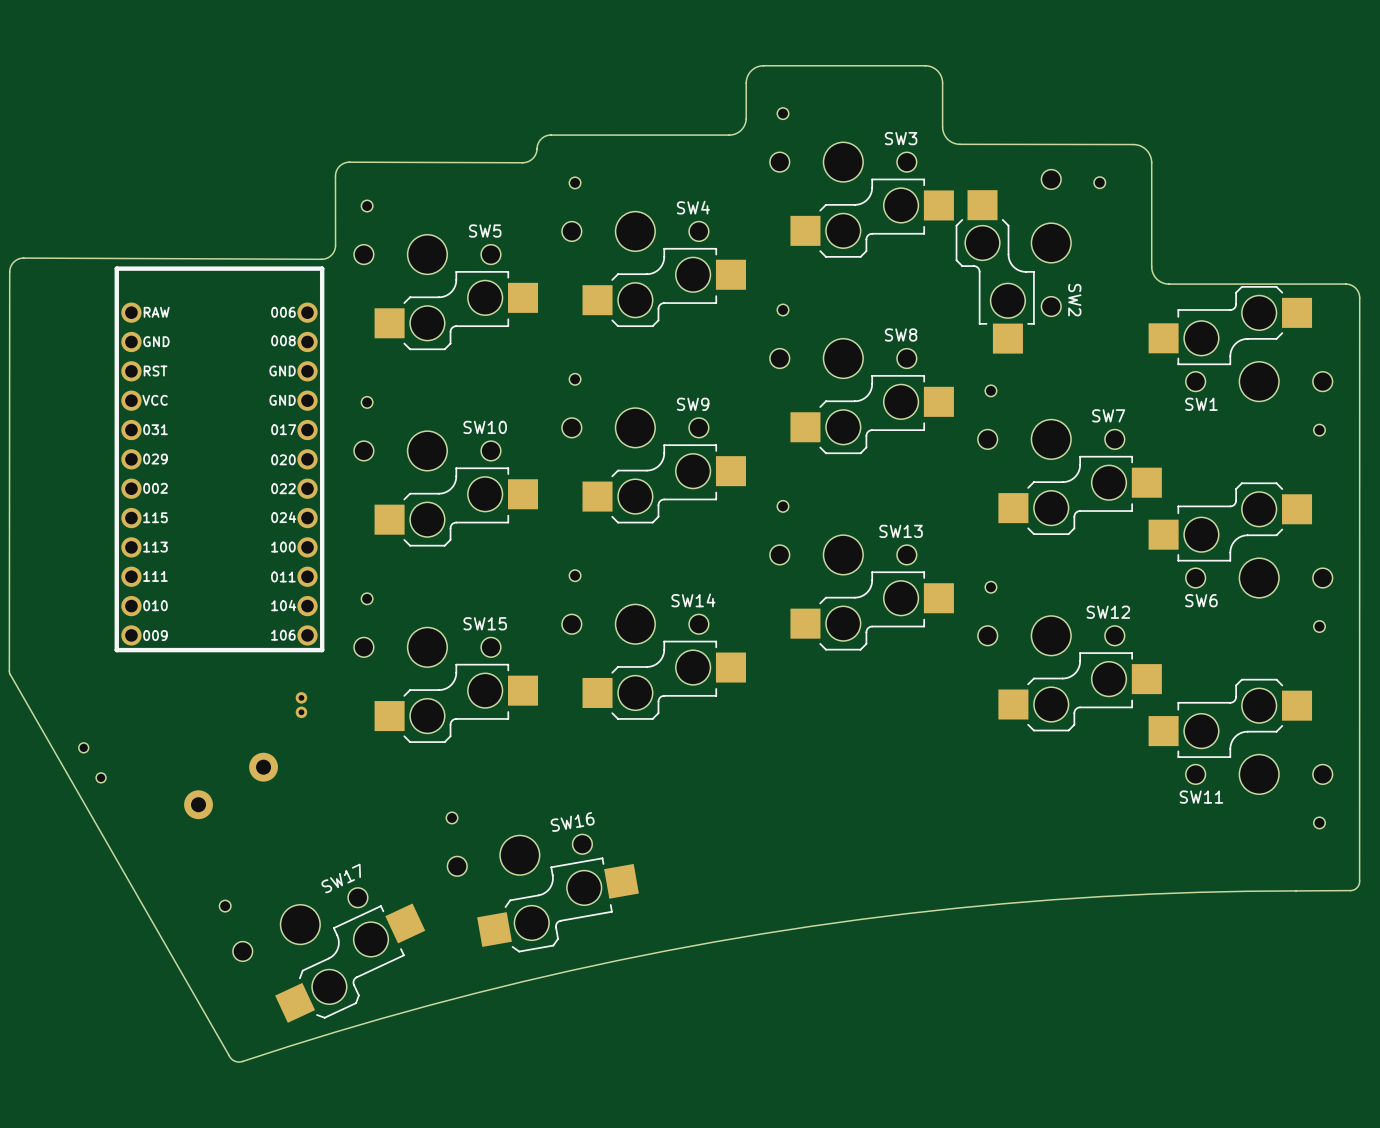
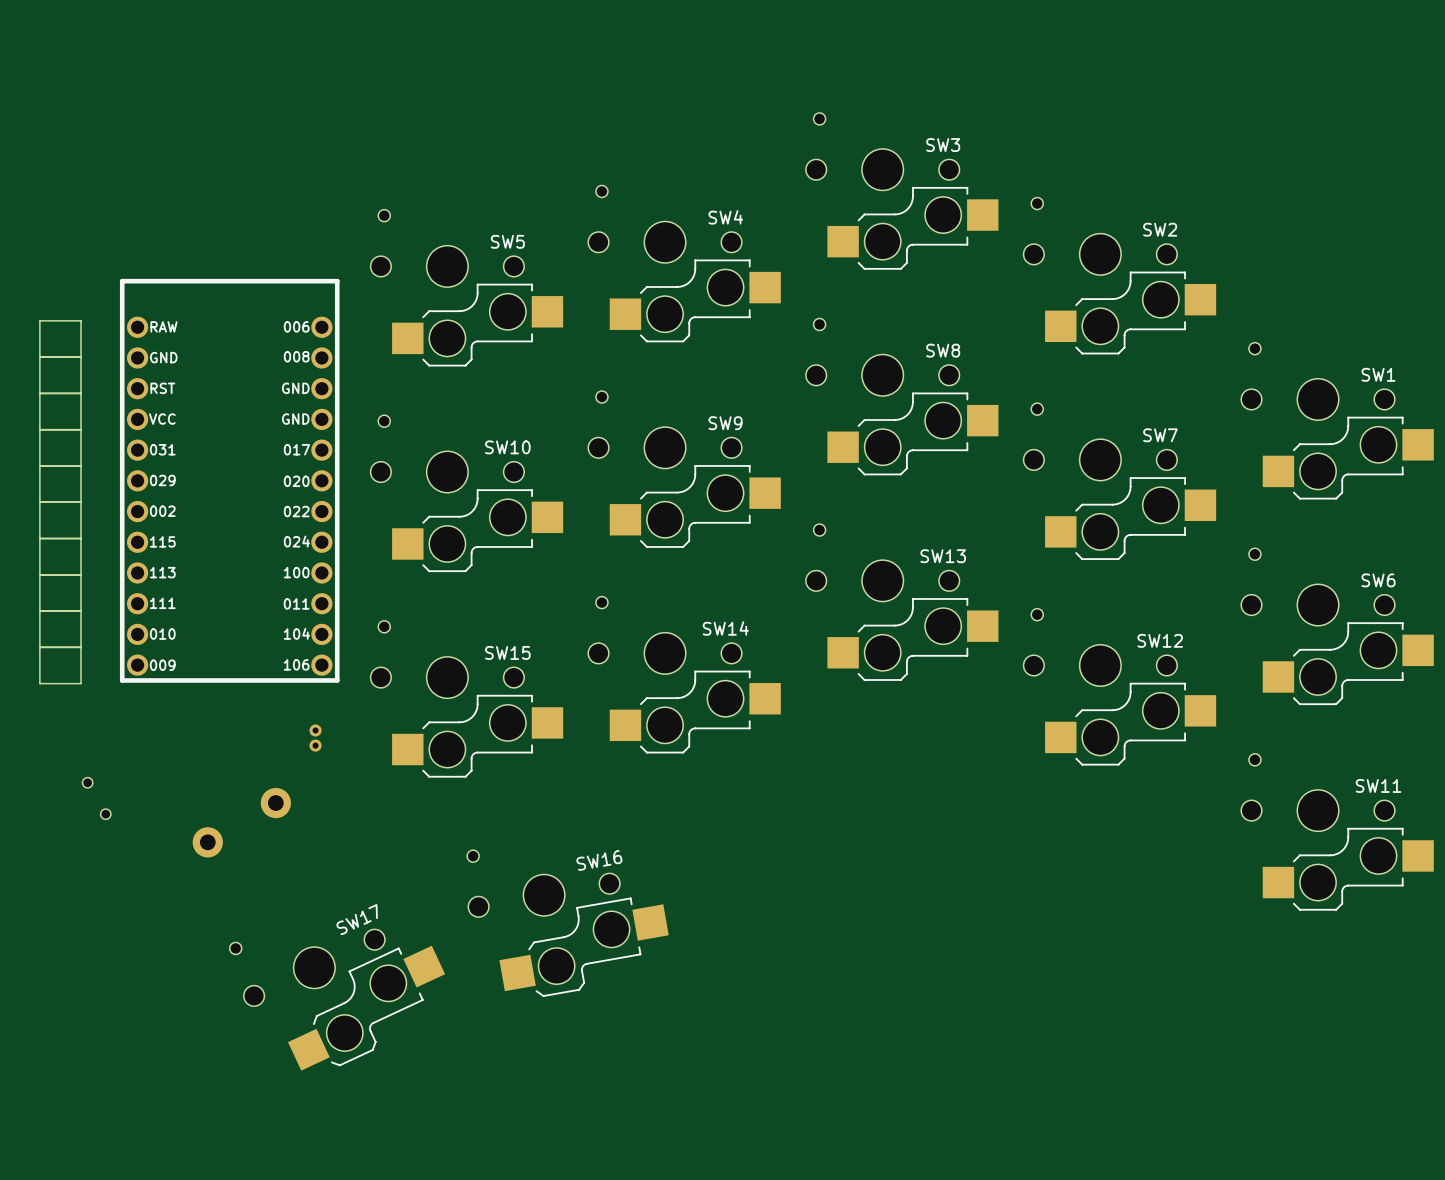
board edge: (550, 135) (541, 139) (533, 157) (524, 162) (343, 163) (337, 168) (335, 174) (335, 248) (331, 255) (324, 258) (23, 258) (14, 261) (10, 267) (9, 672) (231, 1058) (241, 1061) (429, 1005) (571, 970) (666, 950) (810, 926) (955, 908) (1052, 899) (1198, 892) (1350, 890) (1357, 887) (1359, 881) (1359, 297) (1355, 288) (1345, 284) (1169, 284) (1160, 281) (1155, 277) (1151, 269) (1151, 162) (1146, 149) (1133, 144) (953, 143) (946, 137) (942, 129) (942, 78) (935, 69) (927, 65) (756, 67) (751, 70) (746, 78) (745, 123) (741, 130) (731, 134) (550, 135) -> none
SW2 rotation: 0° (1030, 261) -> 90° counterclockwise (1119, 275)
part: none -> (60, 338)
part: none -> (60, 375)
SW1 rotation: 0° (1240, 360) -> 180° (1337, 421)
part: none -> (60, 411)
part: none -> (60, 447)
part: none -> (60, 484)
part: none -> (60, 520)
part: none -> (60, 556)
SW6 rotation: 0° (1240, 557) -> 180° (1337, 626)
part: none -> (60, 592)
part: none -> (60, 629)
part: none -> (60, 665)
SW11 rotation: 0° (1240, 753) -> 180° (1337, 832)

